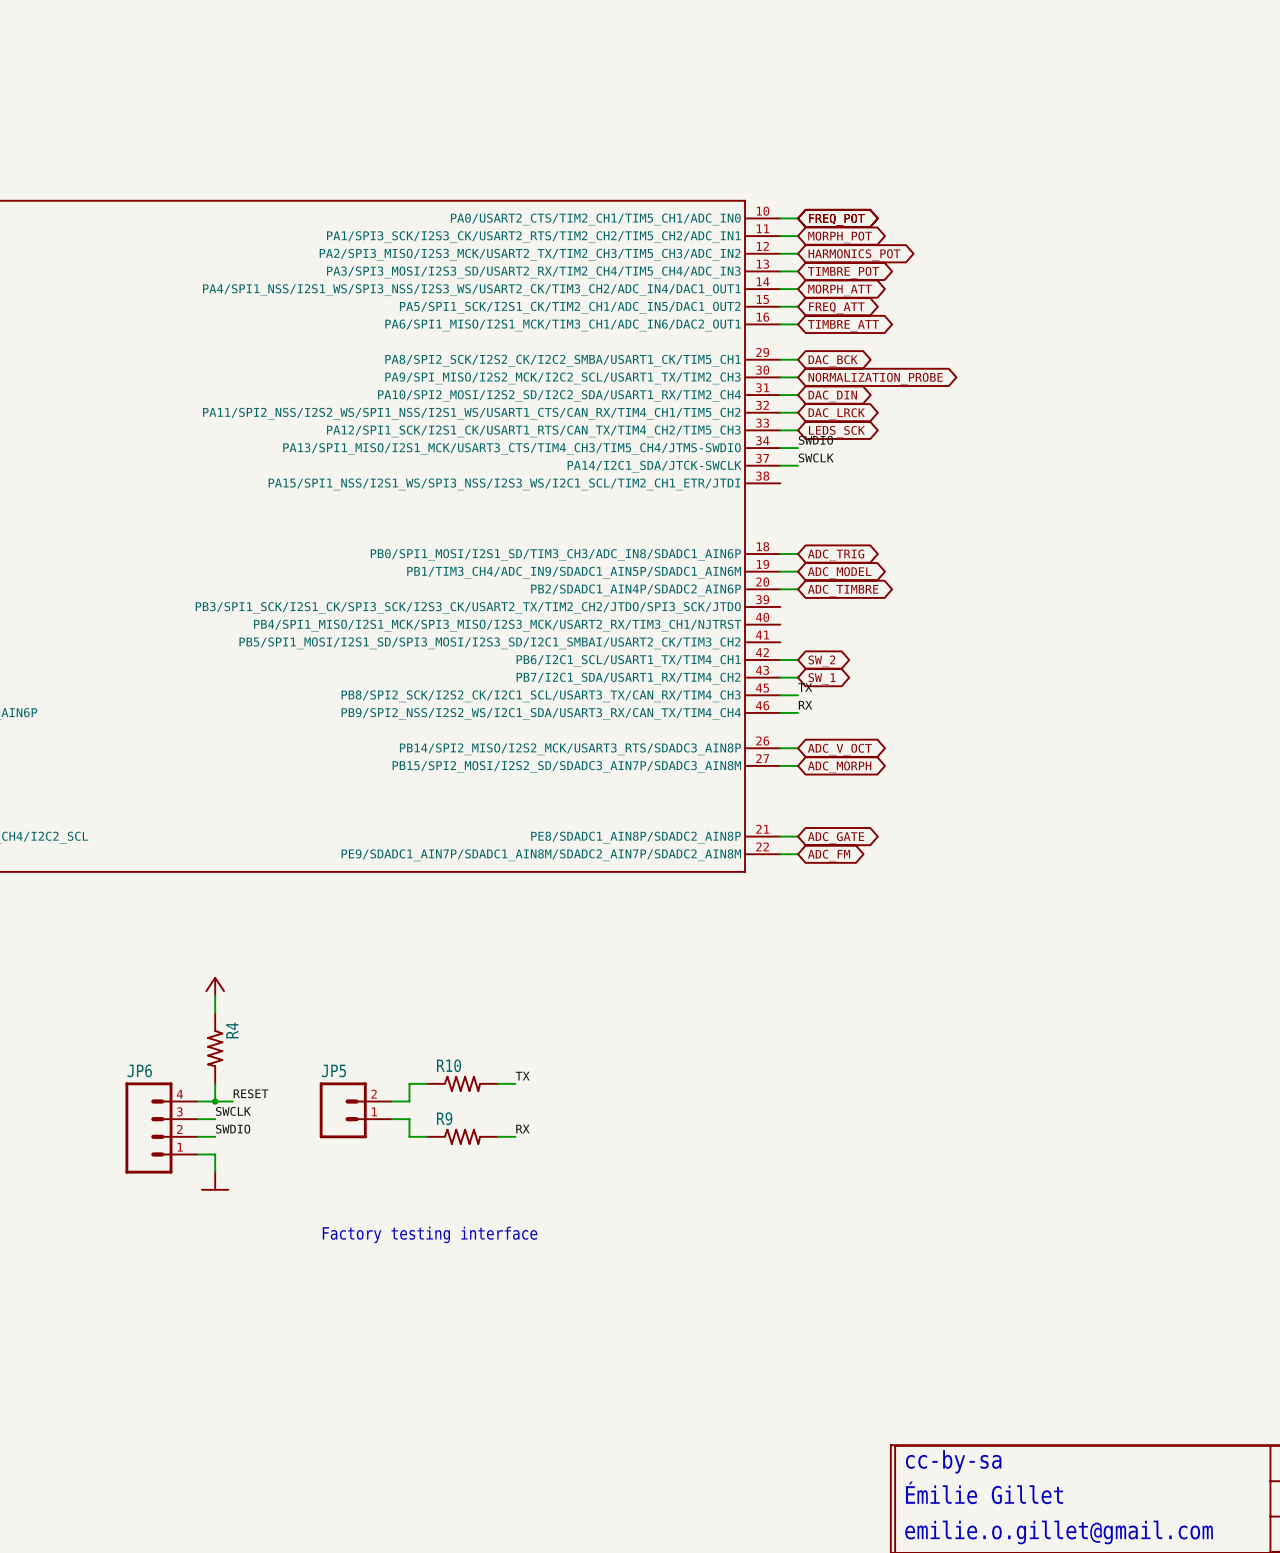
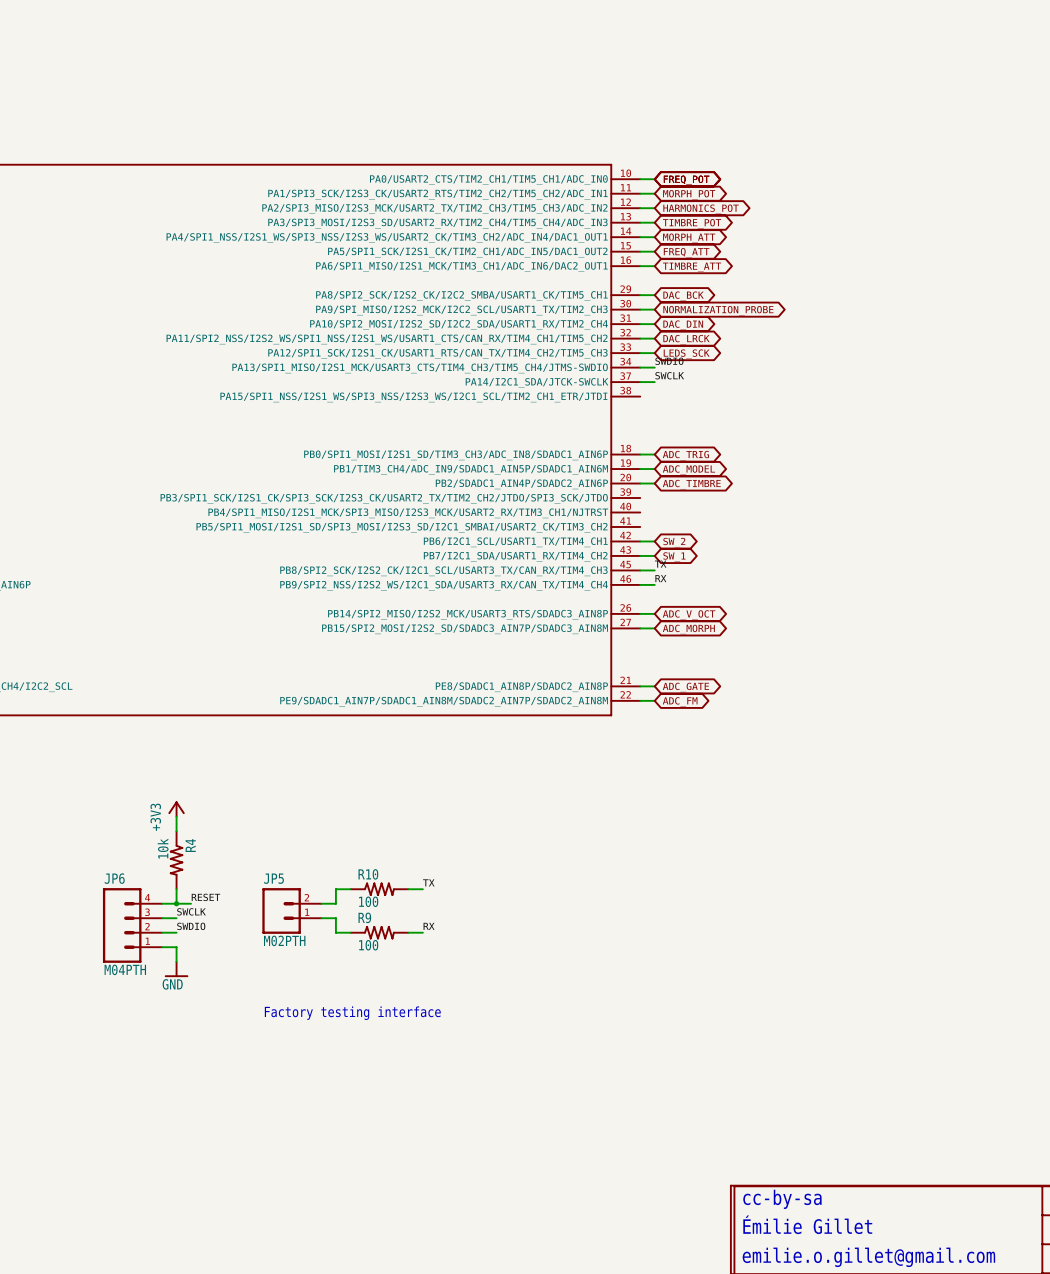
power symbol text: none -> +3V3 (155, 817)
R4 value: none -> 10k (163, 848)
R10 value: none -> 100 (368, 901)
JP5 value: none -> M02PTH (284, 940)
R9 value: none -> 100 (368, 945)
JP6 value: none -> M04PTH (125, 969)
power symbol text: none -> GND (172, 984)

